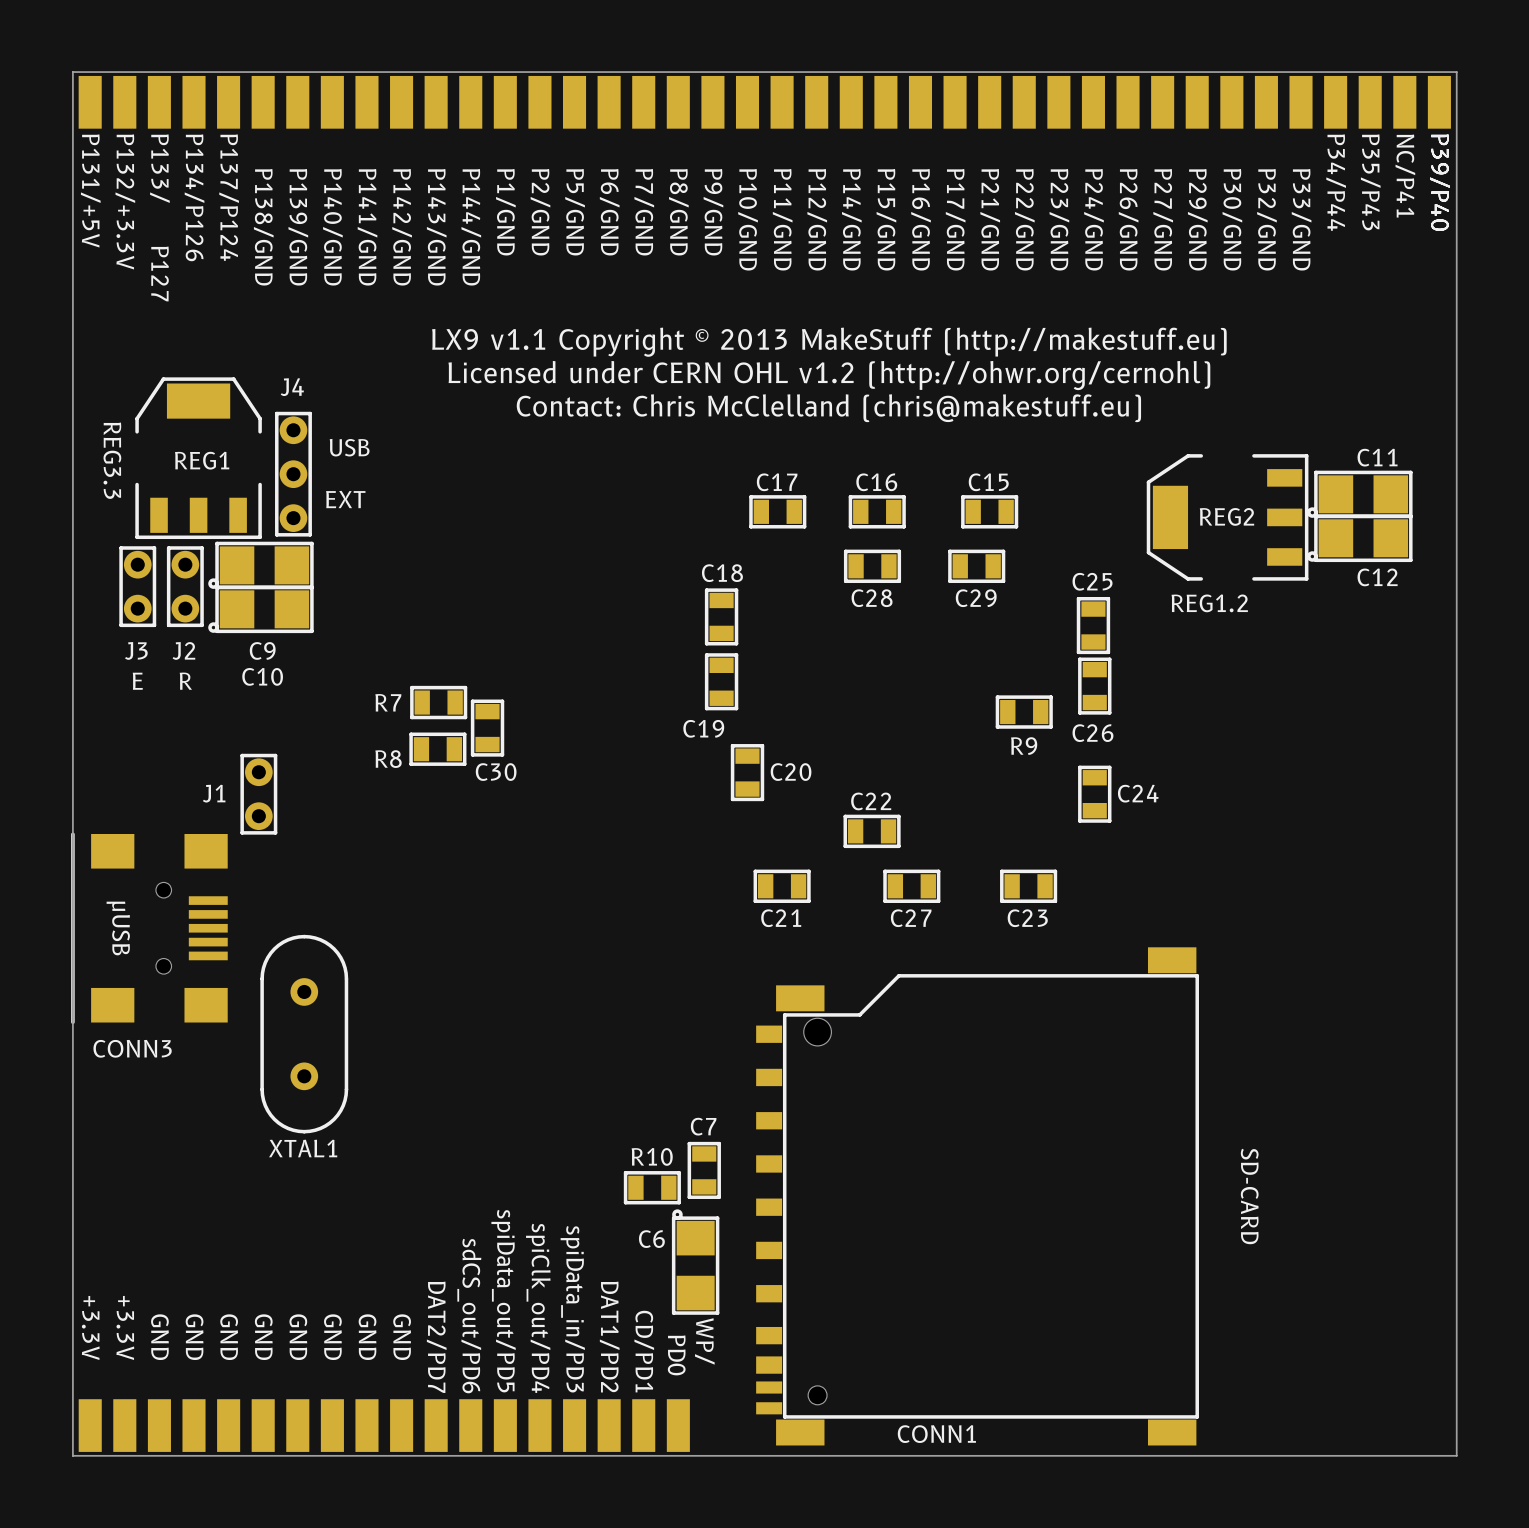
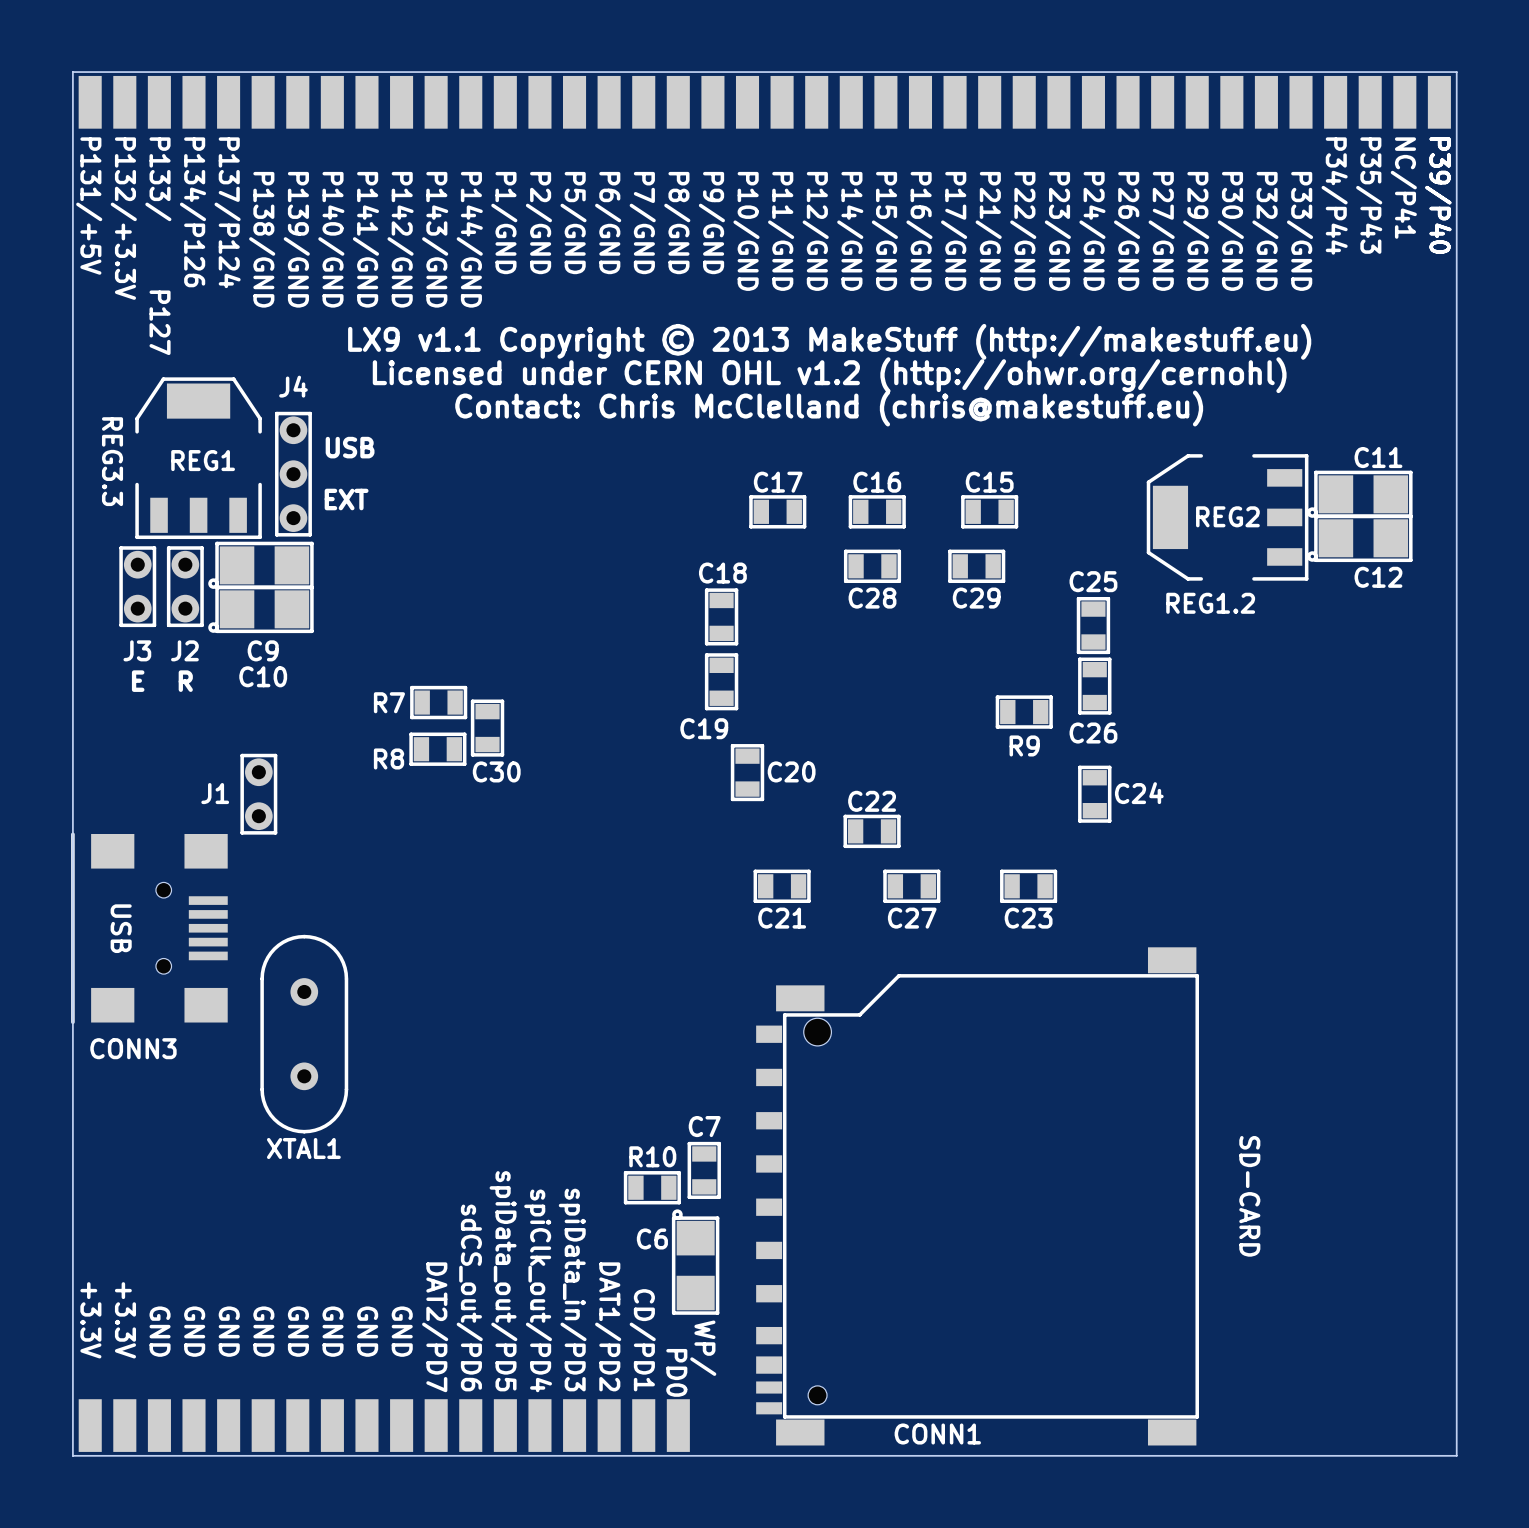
CONN3 value: μUSB (118, 928) -> USB (121, 928)

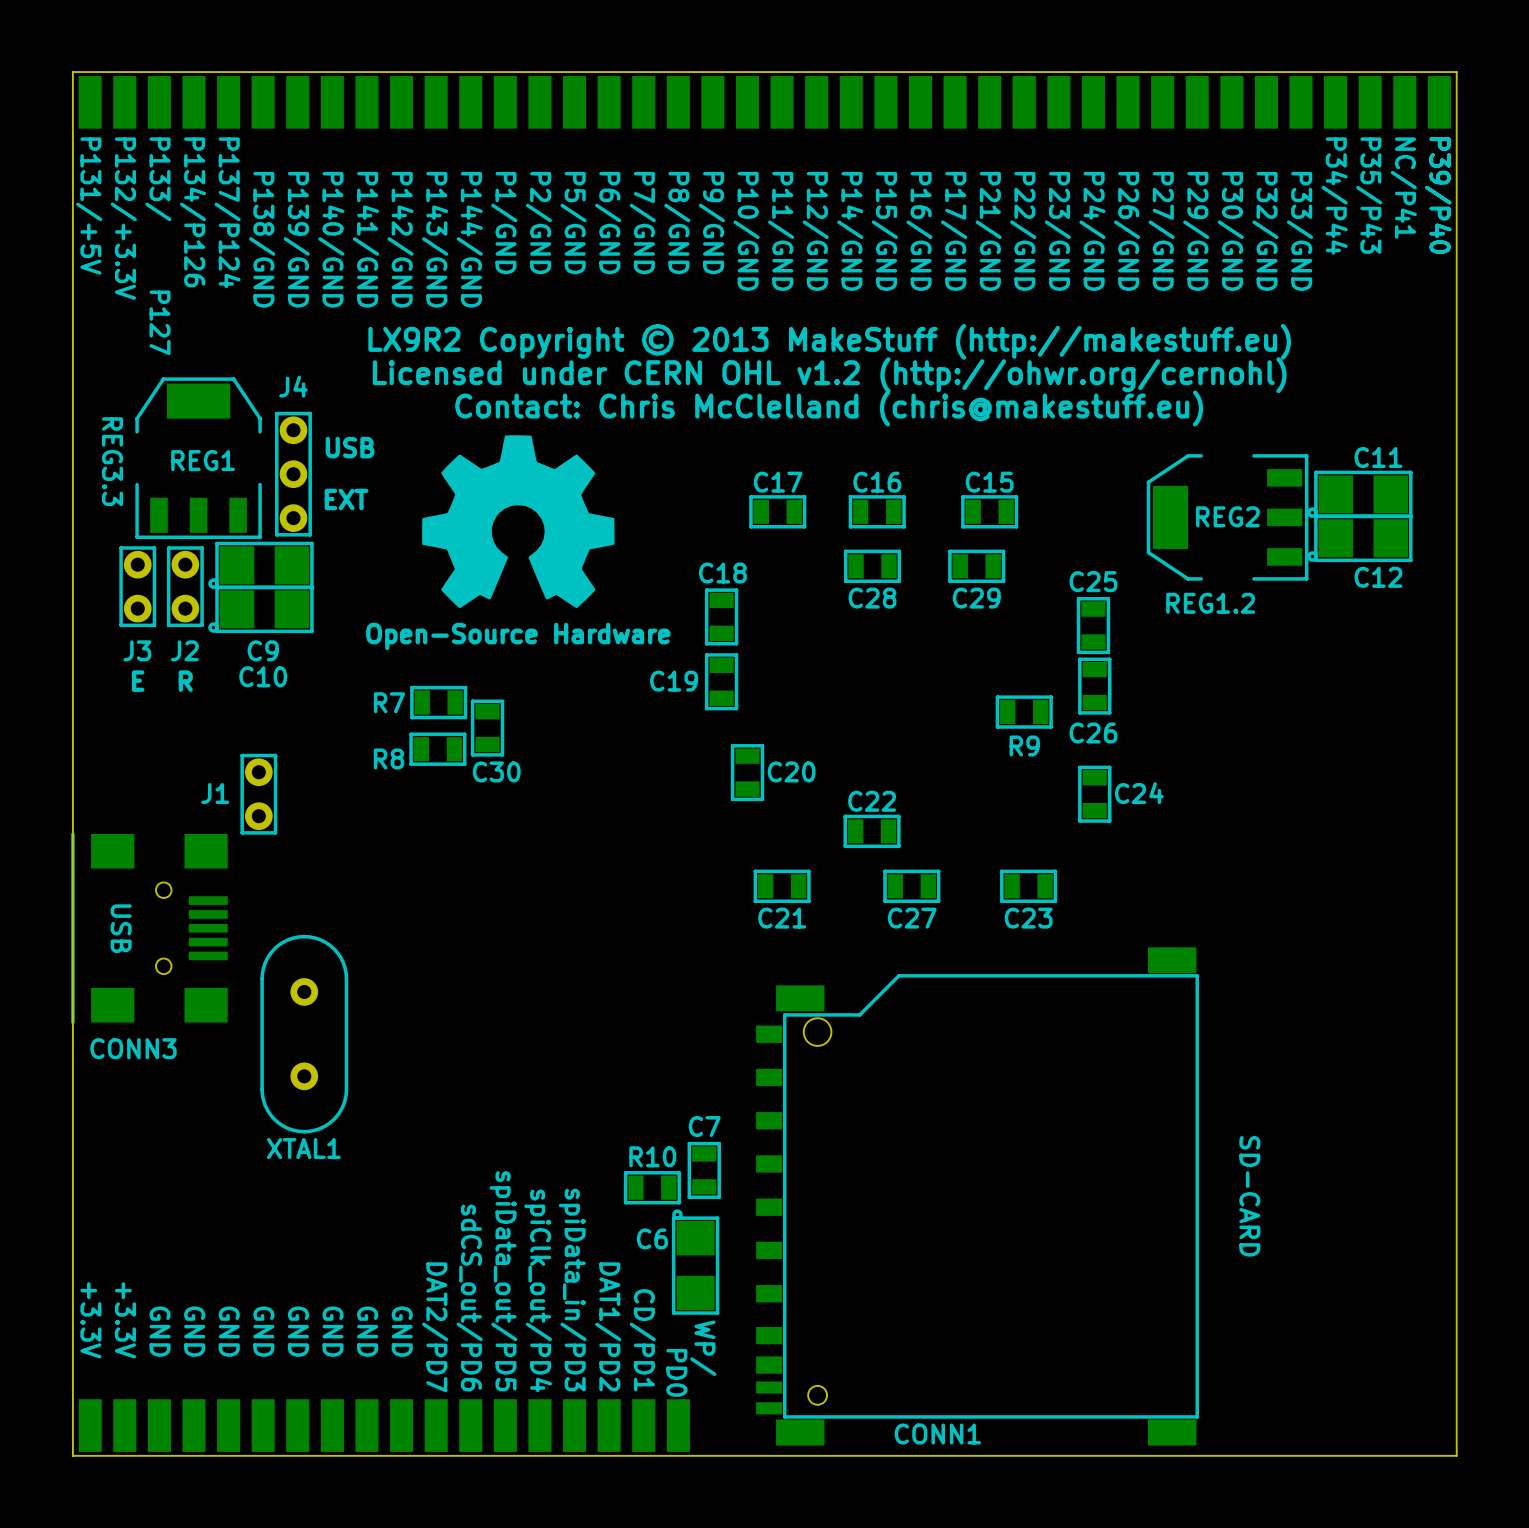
text: LX9 v1.1 Copyright © 2013 MakeStuff (http://makestuff.eu) (829, 341) -> LX9R2 Copyright © 2013 MakeStuff (http://makestuff.eu) (829, 341)
Open-Source Hardware: none -> (518, 521)
C19 name position: C19 (704, 728) -> C19 (674, 681)

